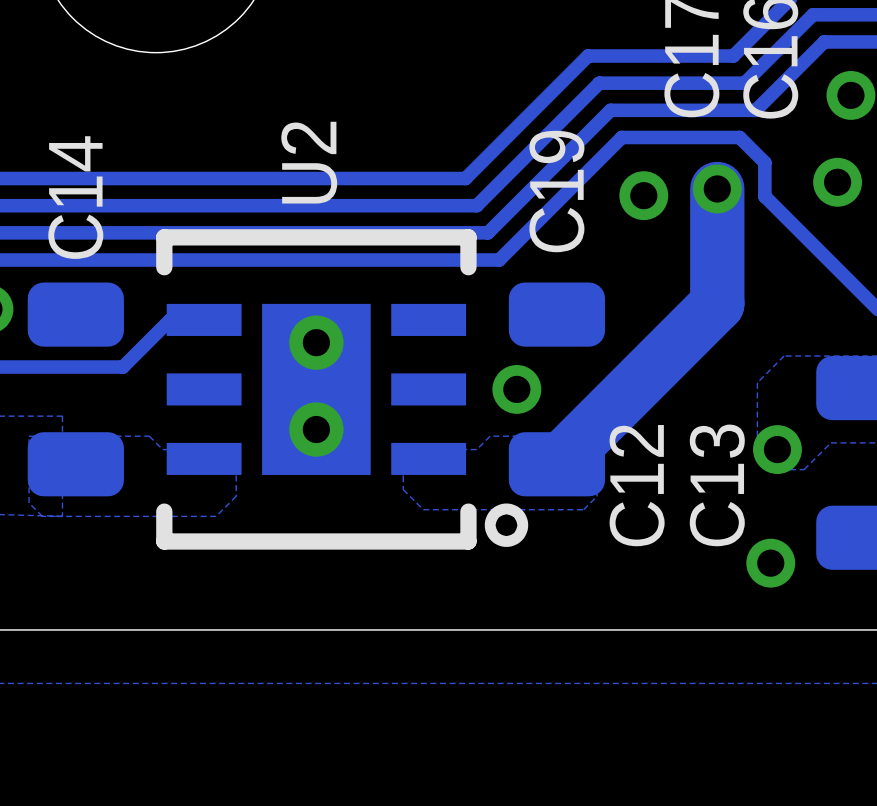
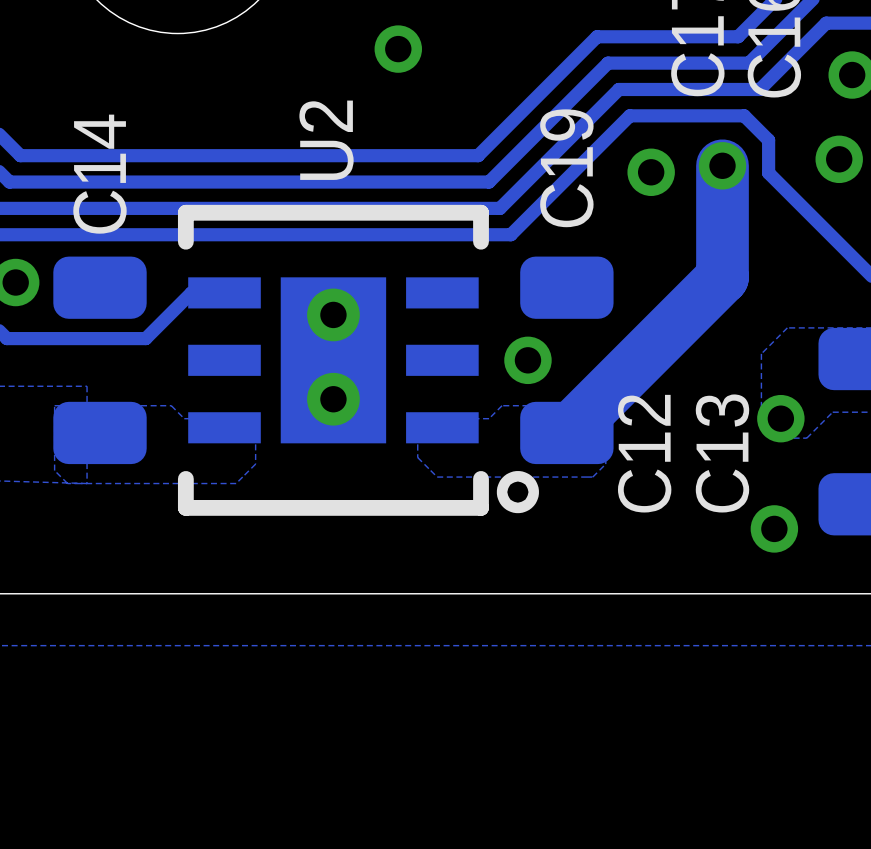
via: none -> (398, 49)

